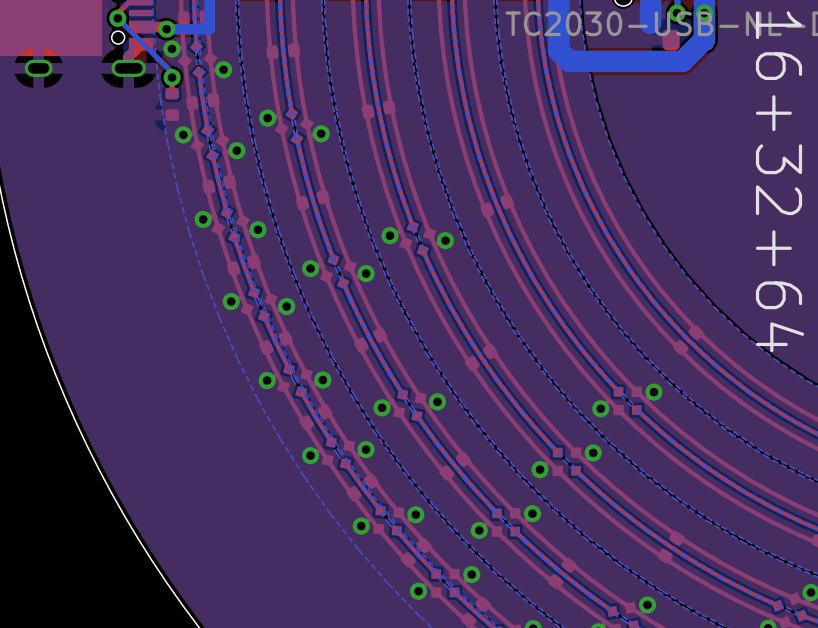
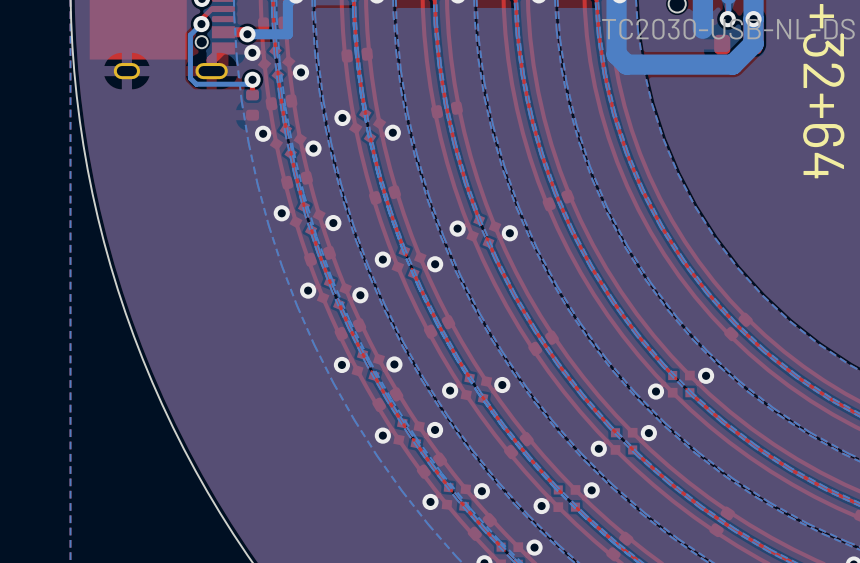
bottom track: (117, 18) (172, 72) (172, 77) -> (201, 24) (190, 35) (190, 78) (196, 84) (248, 84) (252, 79)

